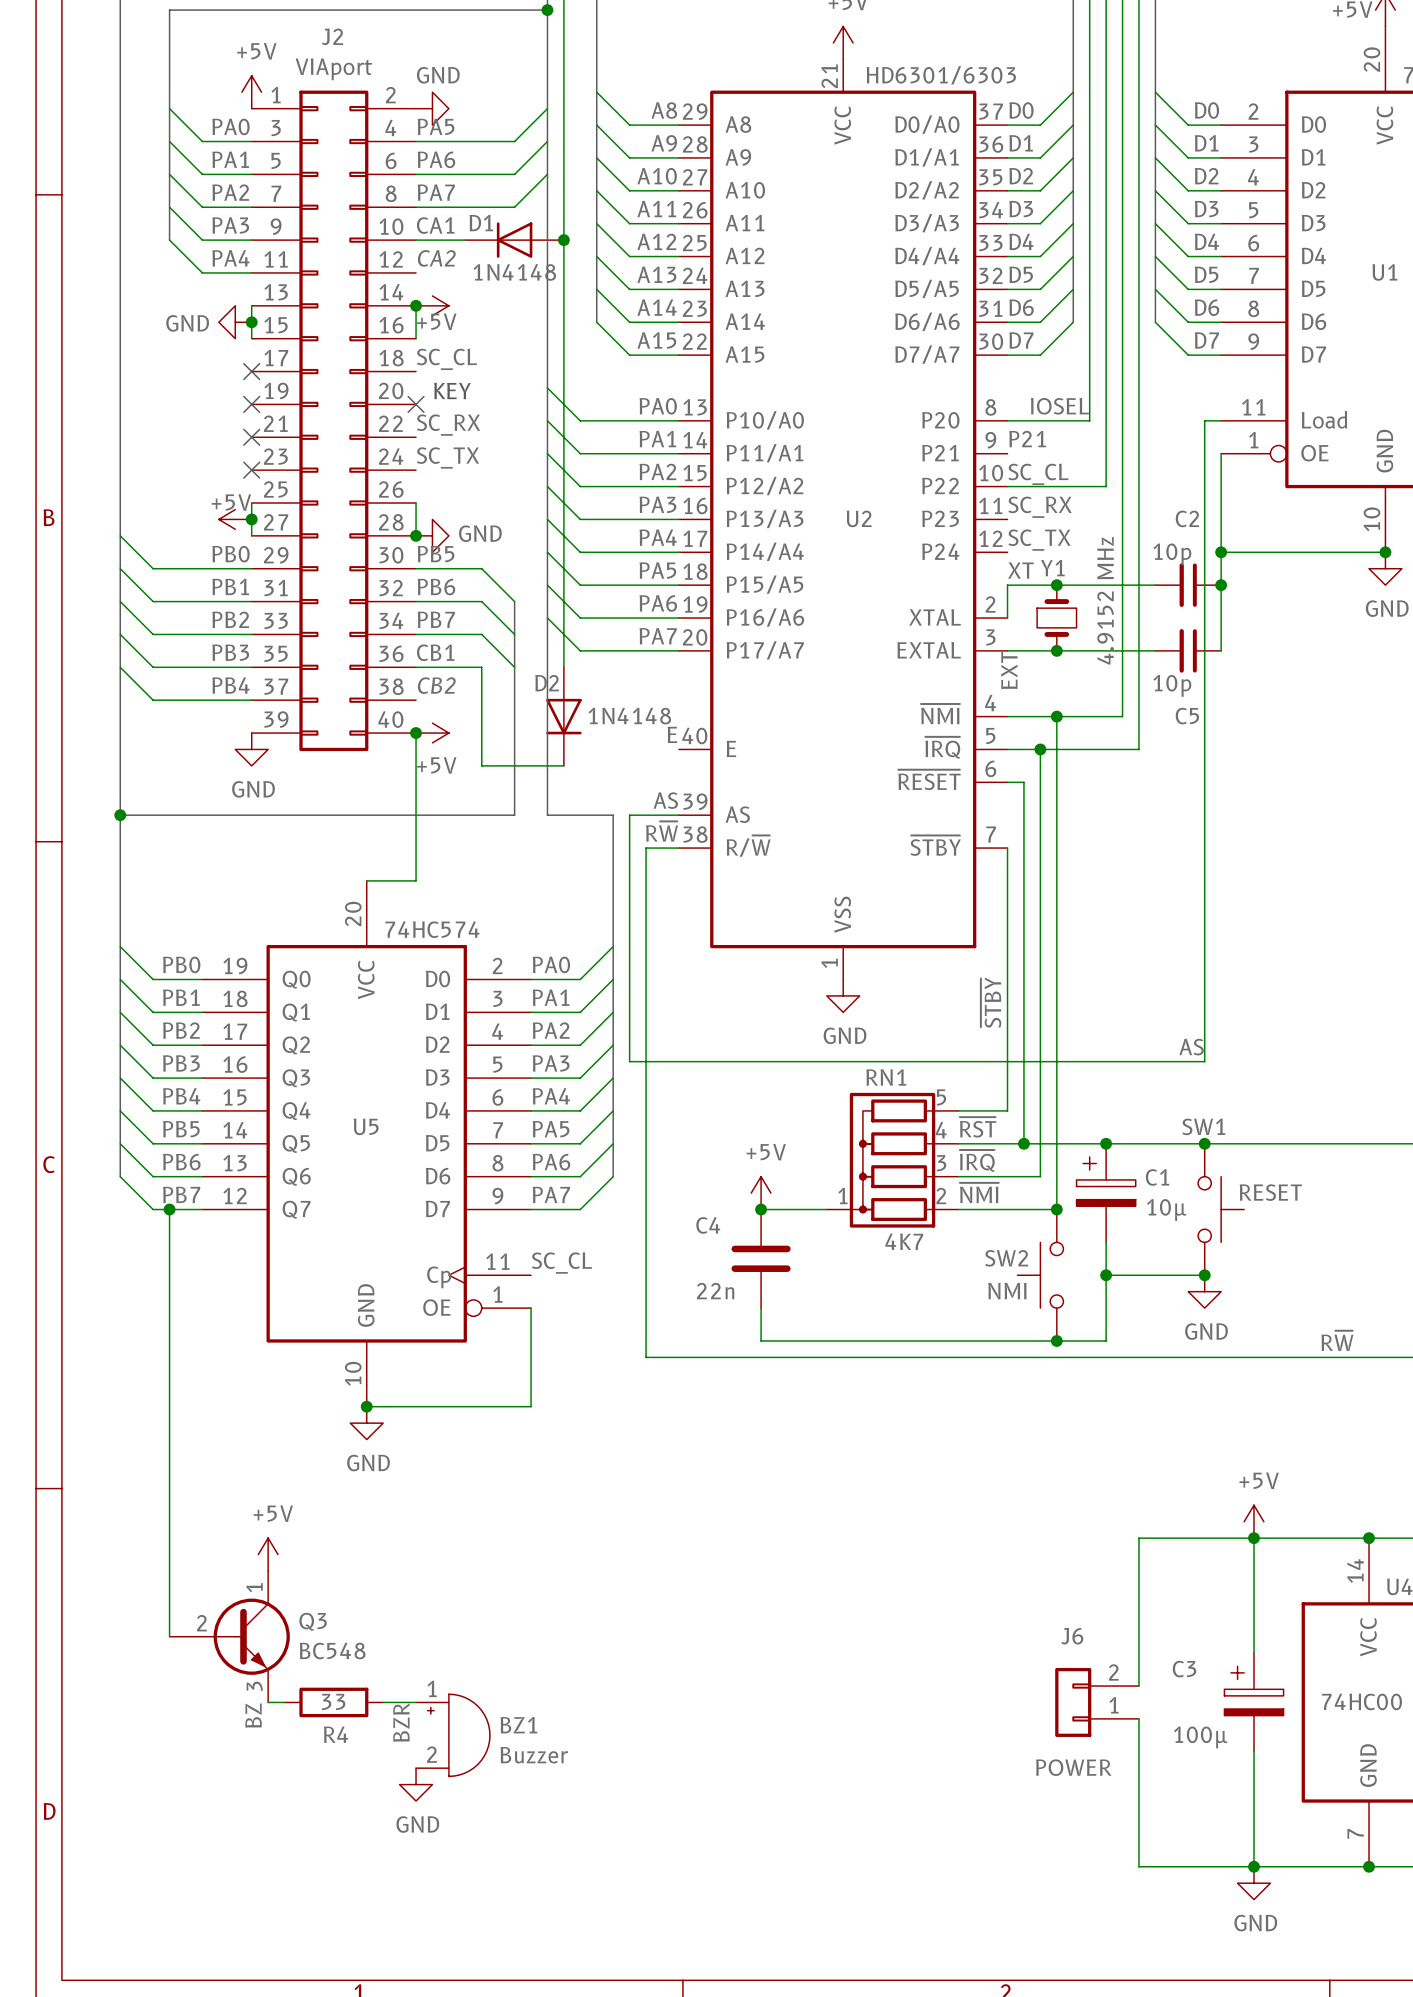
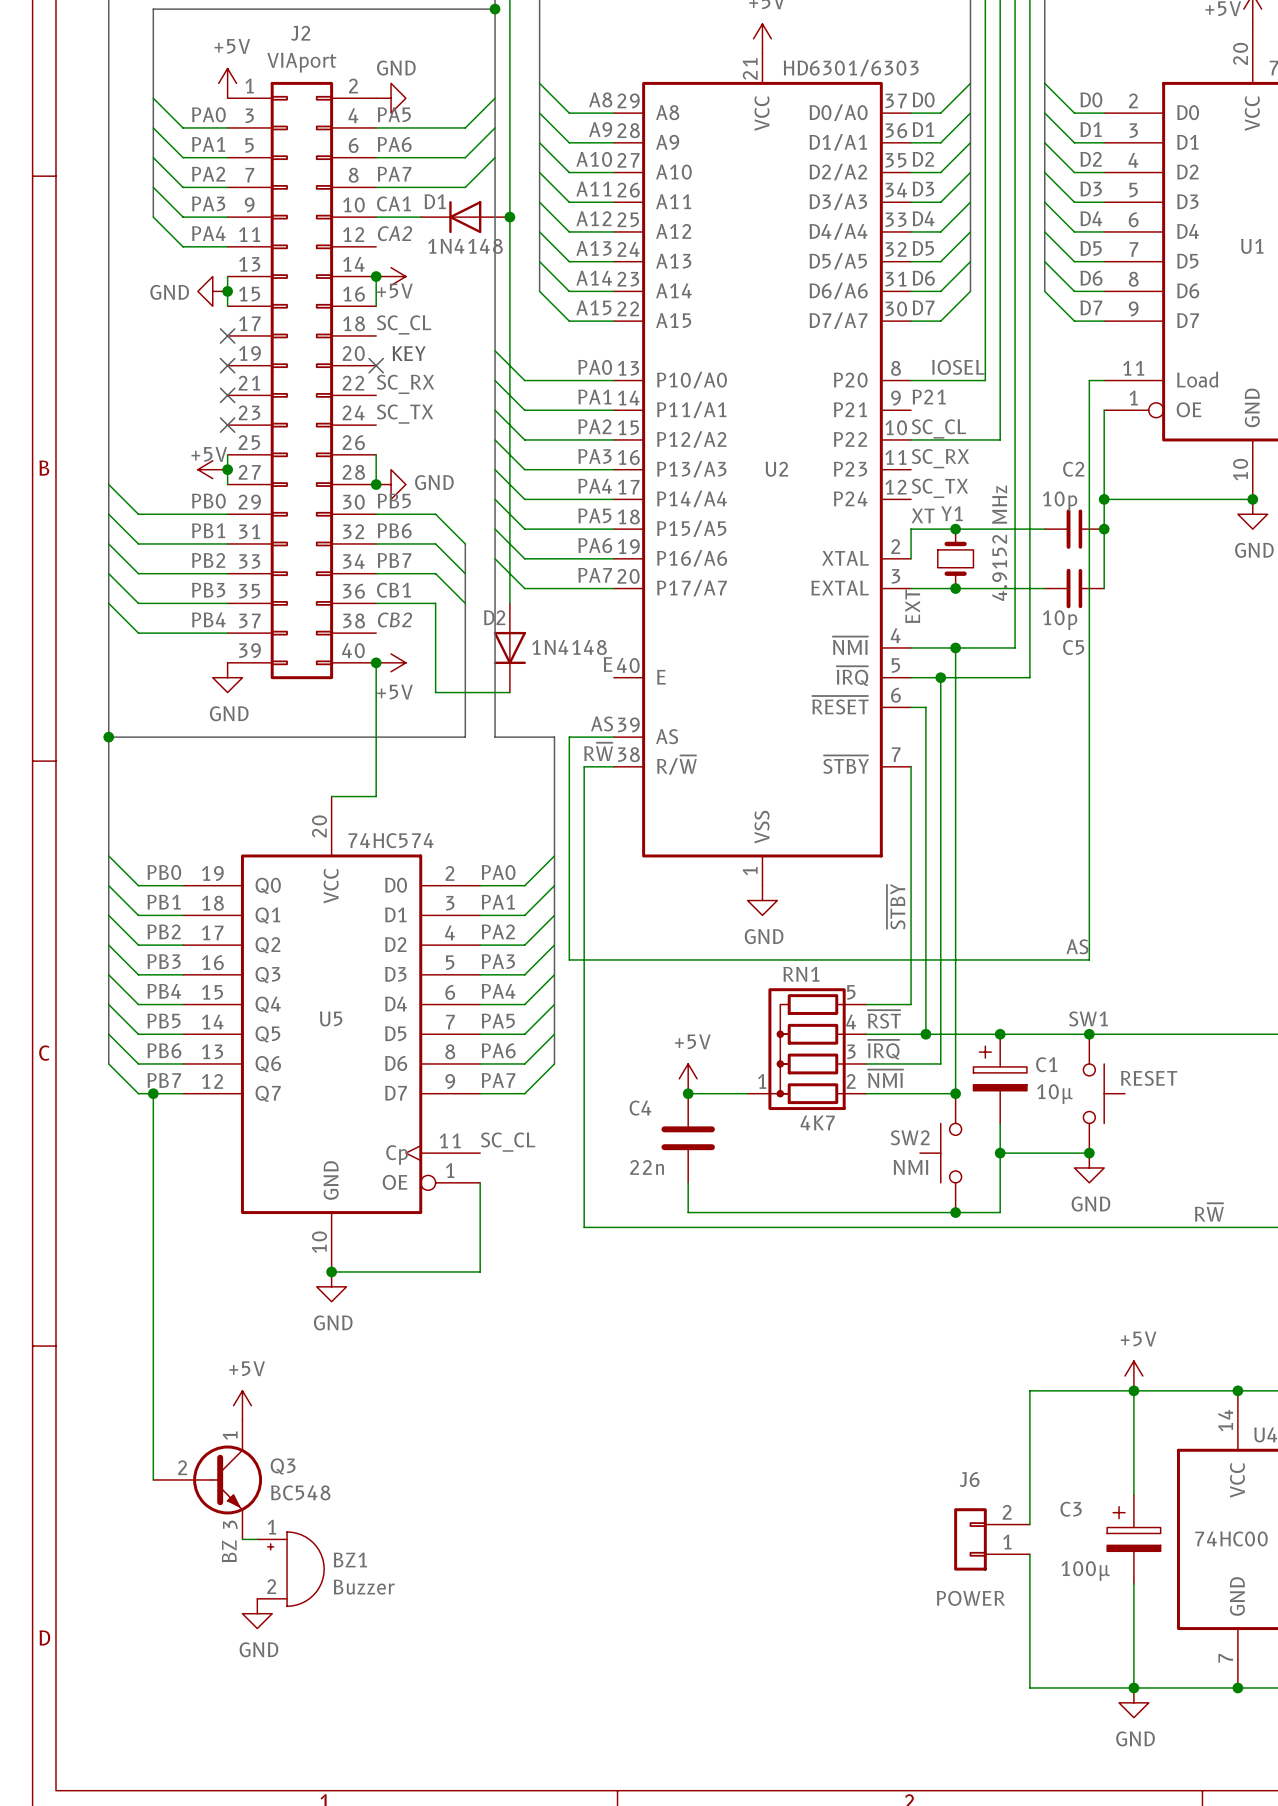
R4: 33 (333, 1702) -> none
wire: (383, 1702) (416, 1702) -> none
label: BZR (401, 1722) -> none
BZ1 position: (452, 1735) -> (290, 1569)
power symbol position: GND (416, 1784) -> GND (257, 1613)

